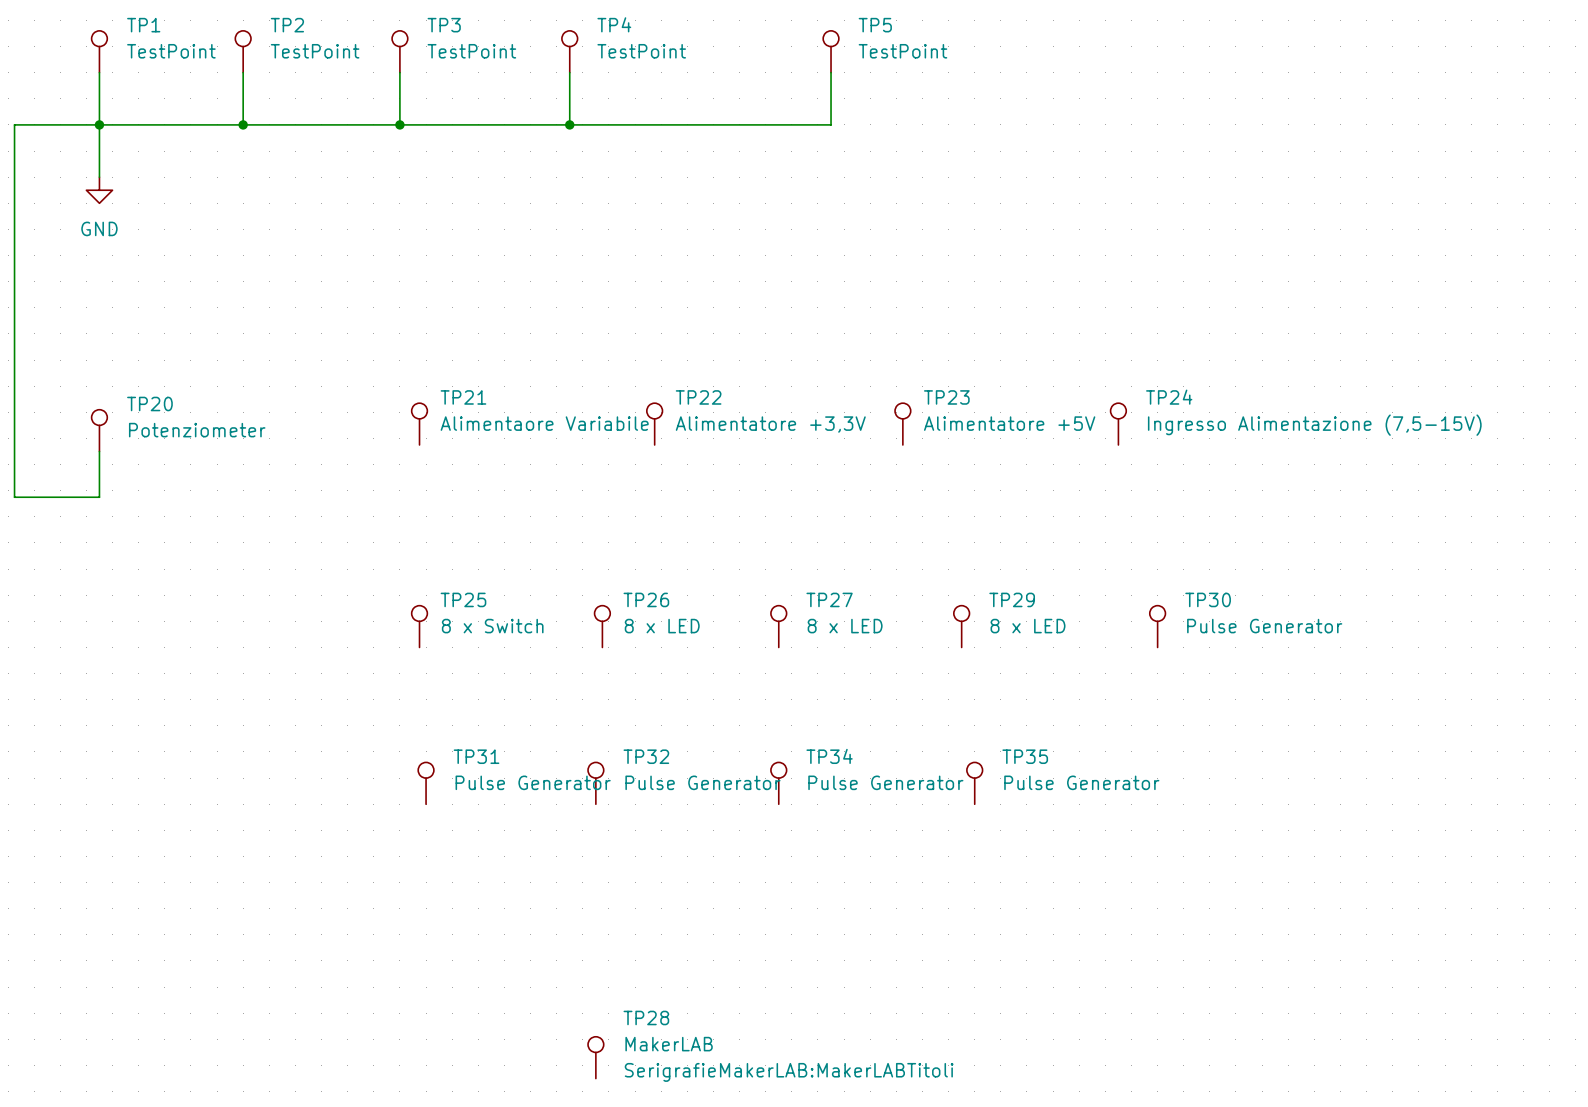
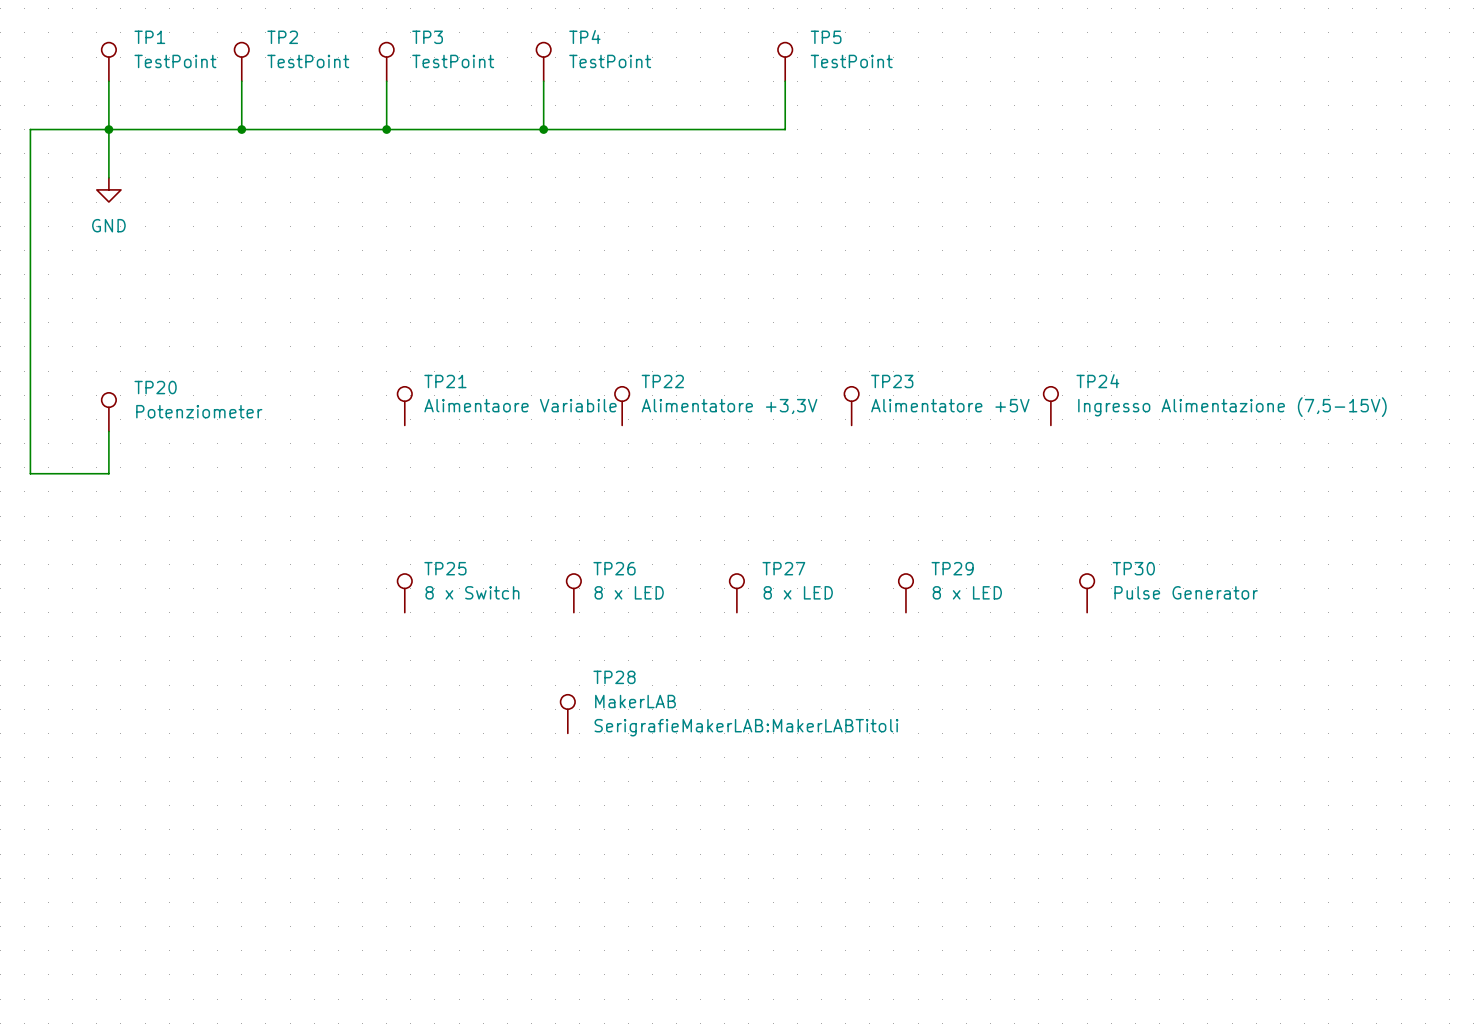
TP31: Pulse Generator (426, 783) -> none
TP32: Pulse Generator (595, 783) -> none
TP34: Pulse Generator (778, 783) -> none
TP35: Pulse Generator (974, 783) -> none
TP28 position: (595, 1057) -> (567, 714)

